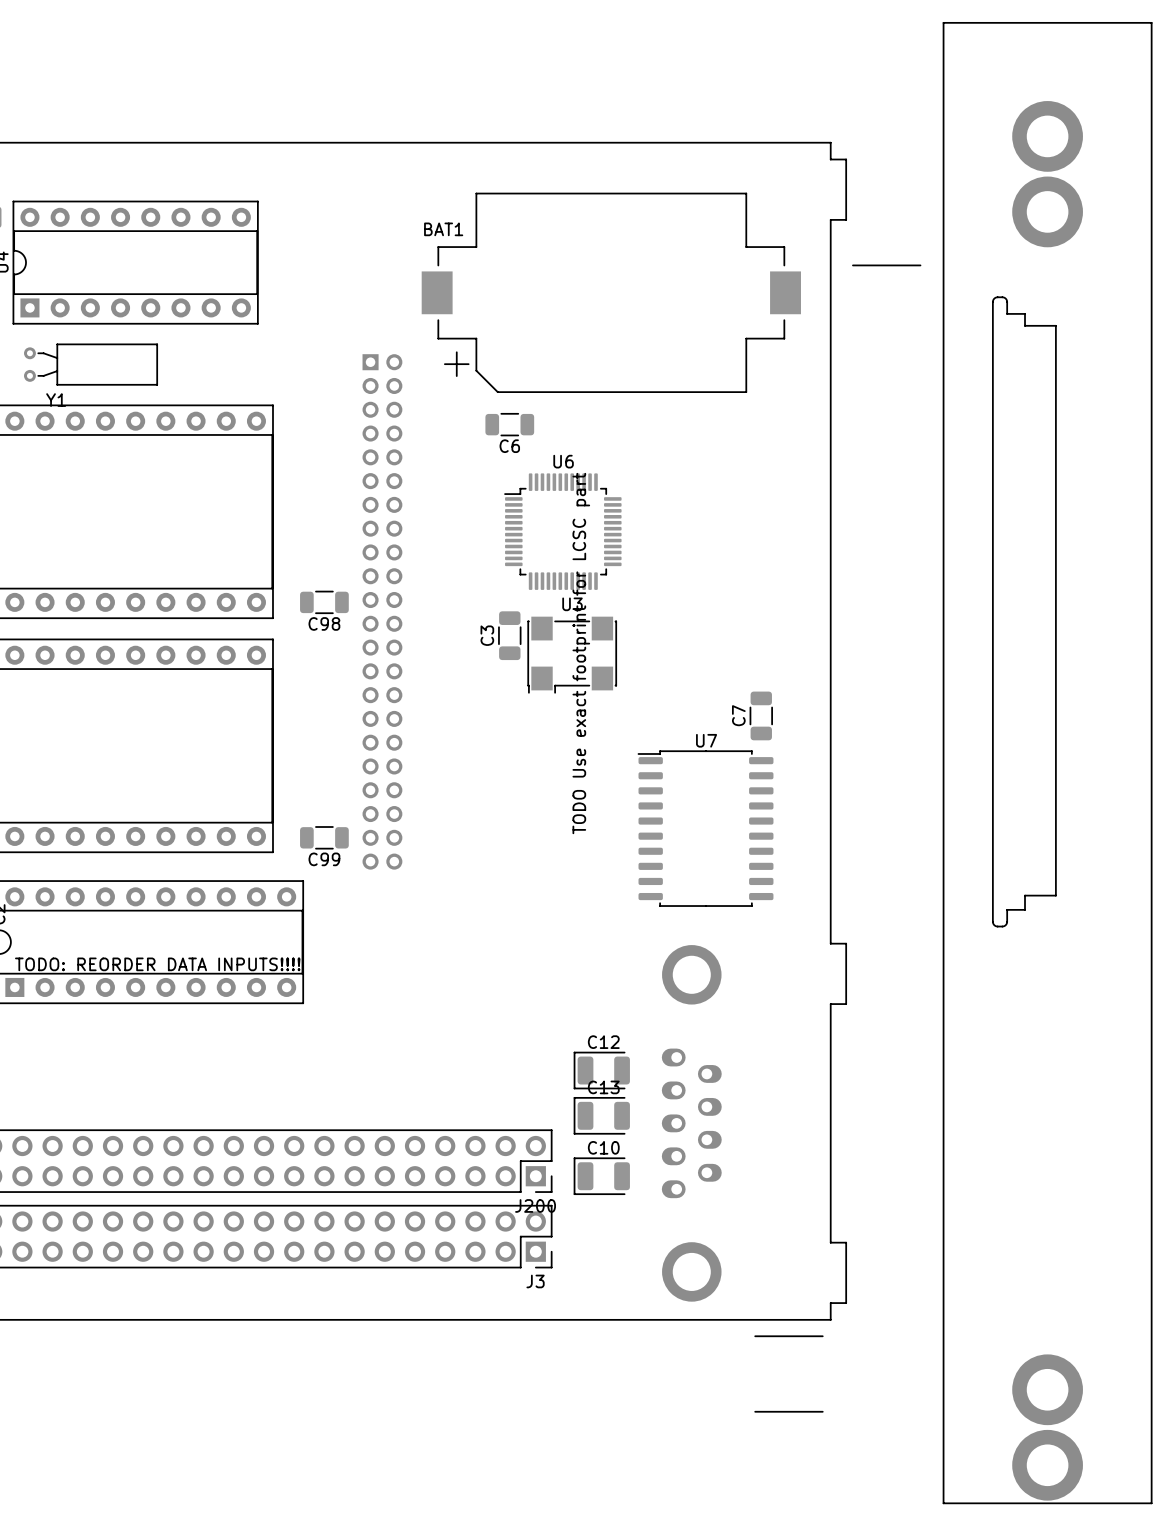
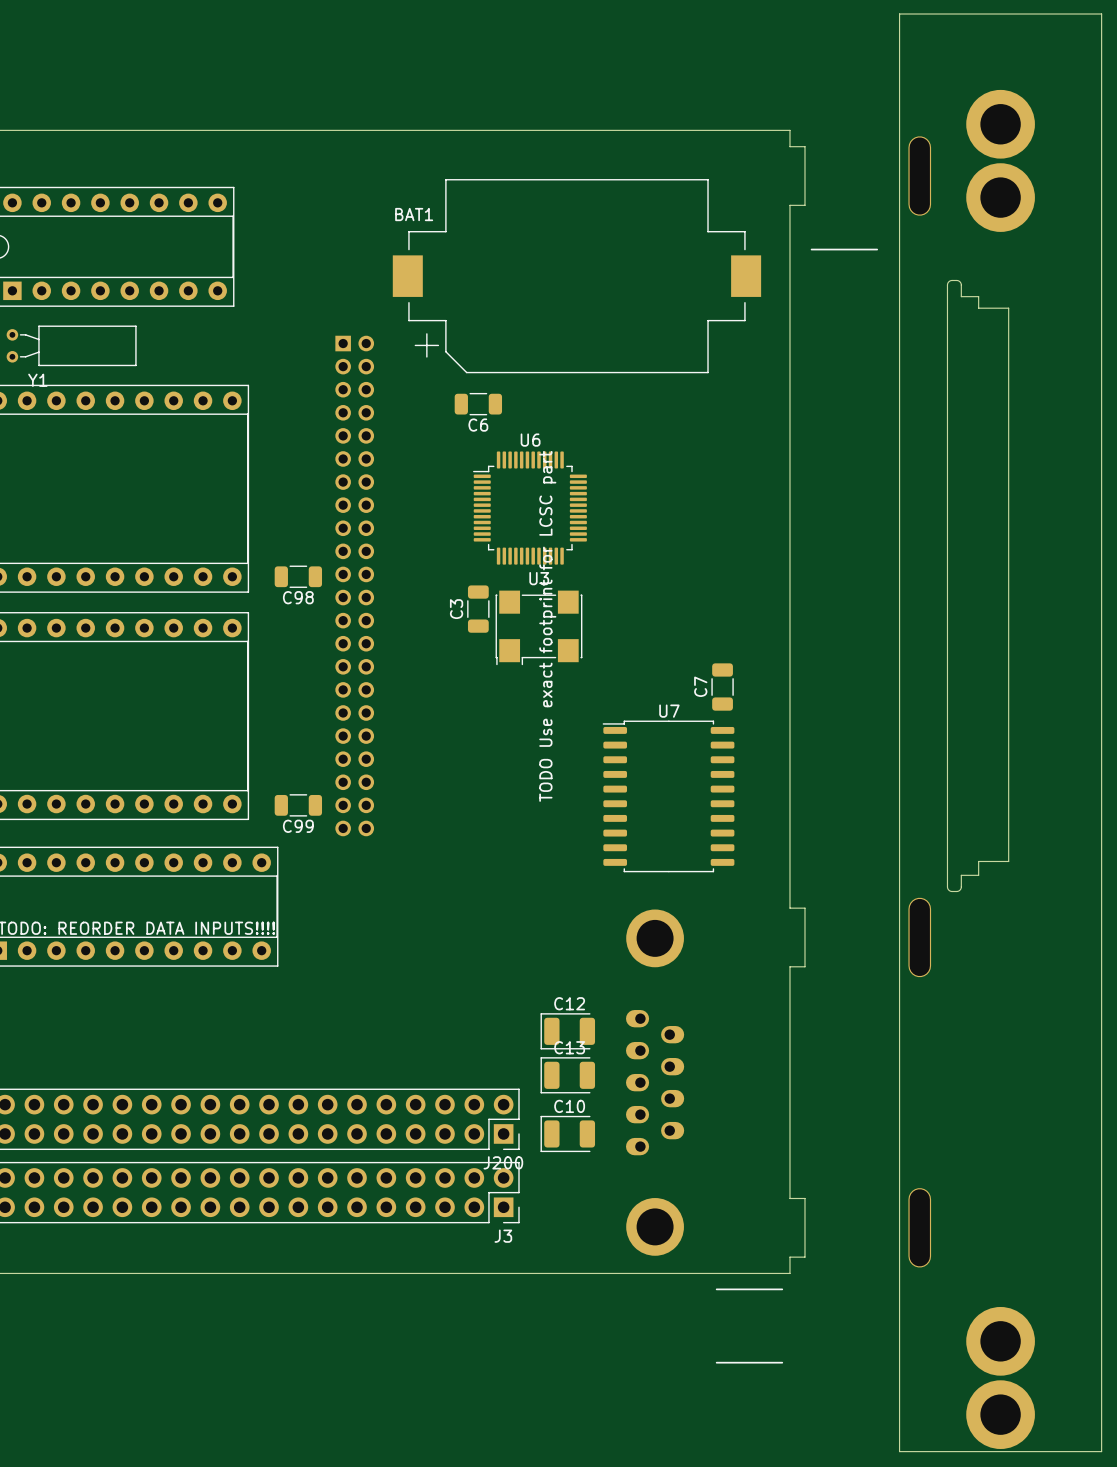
part: none -> (919, 176)
part: none -> (919, 937)
part: none -> (919, 1227)

